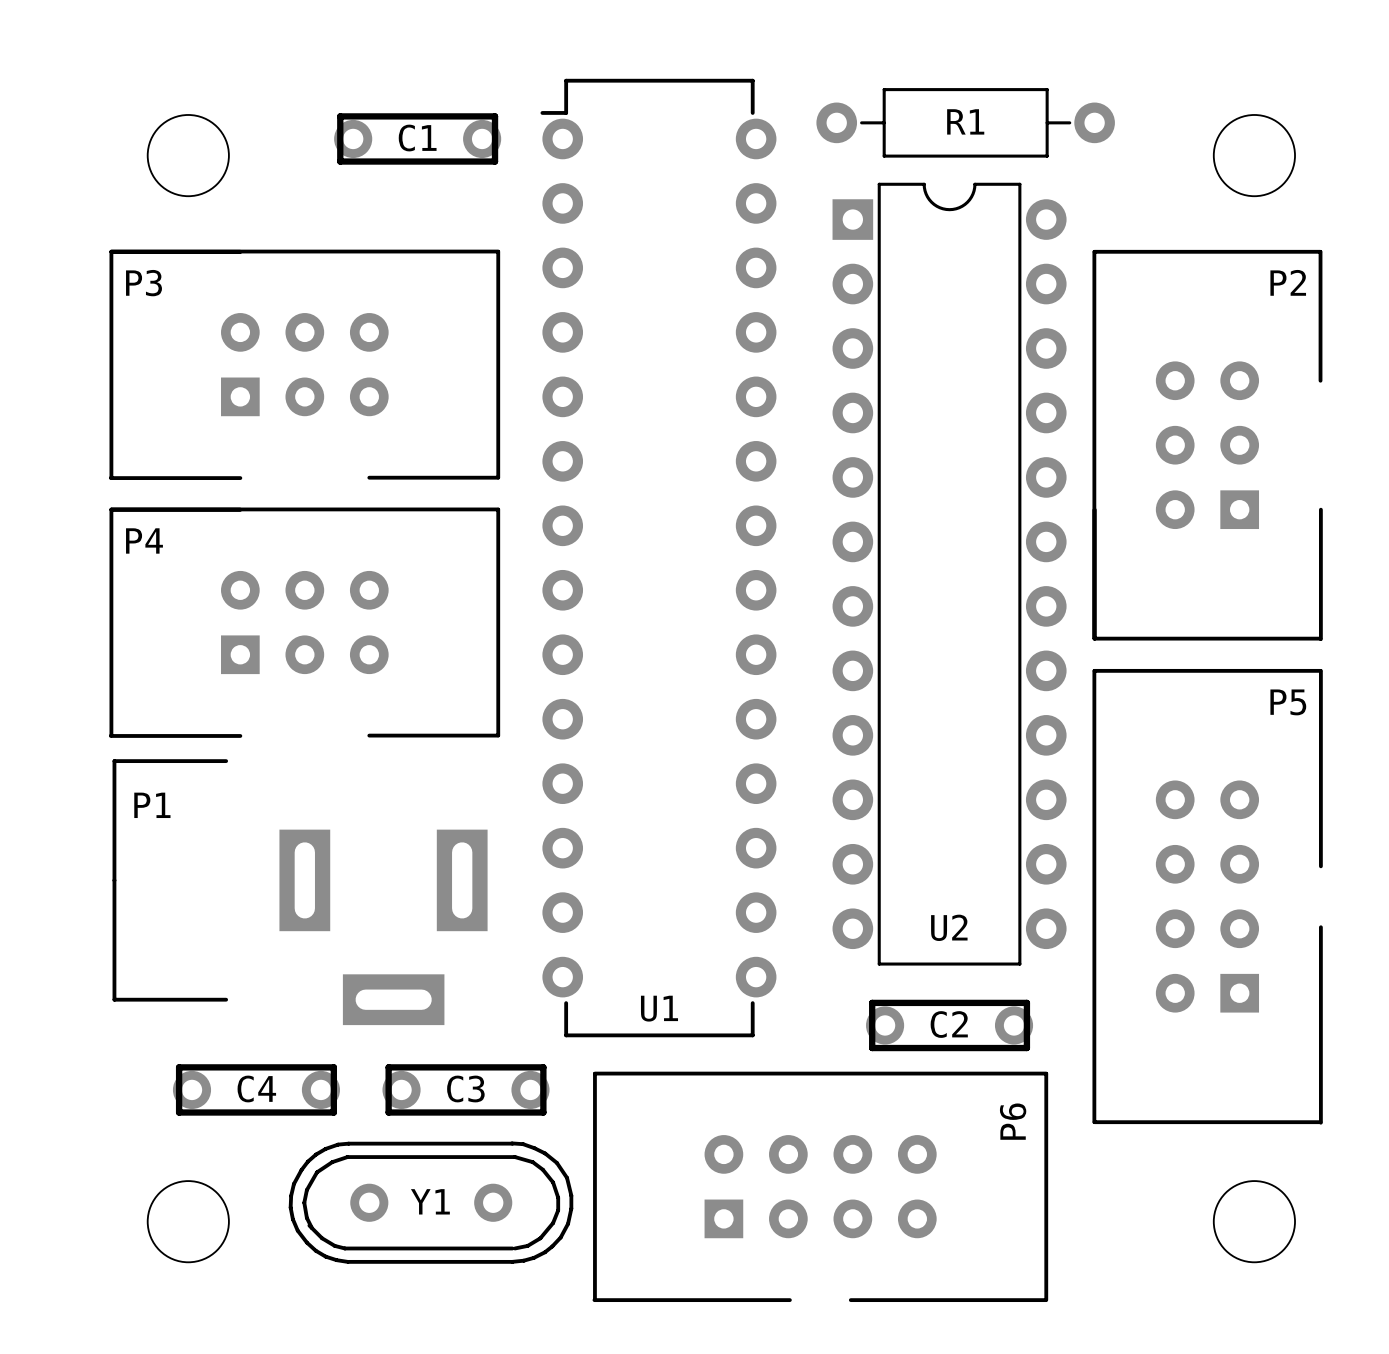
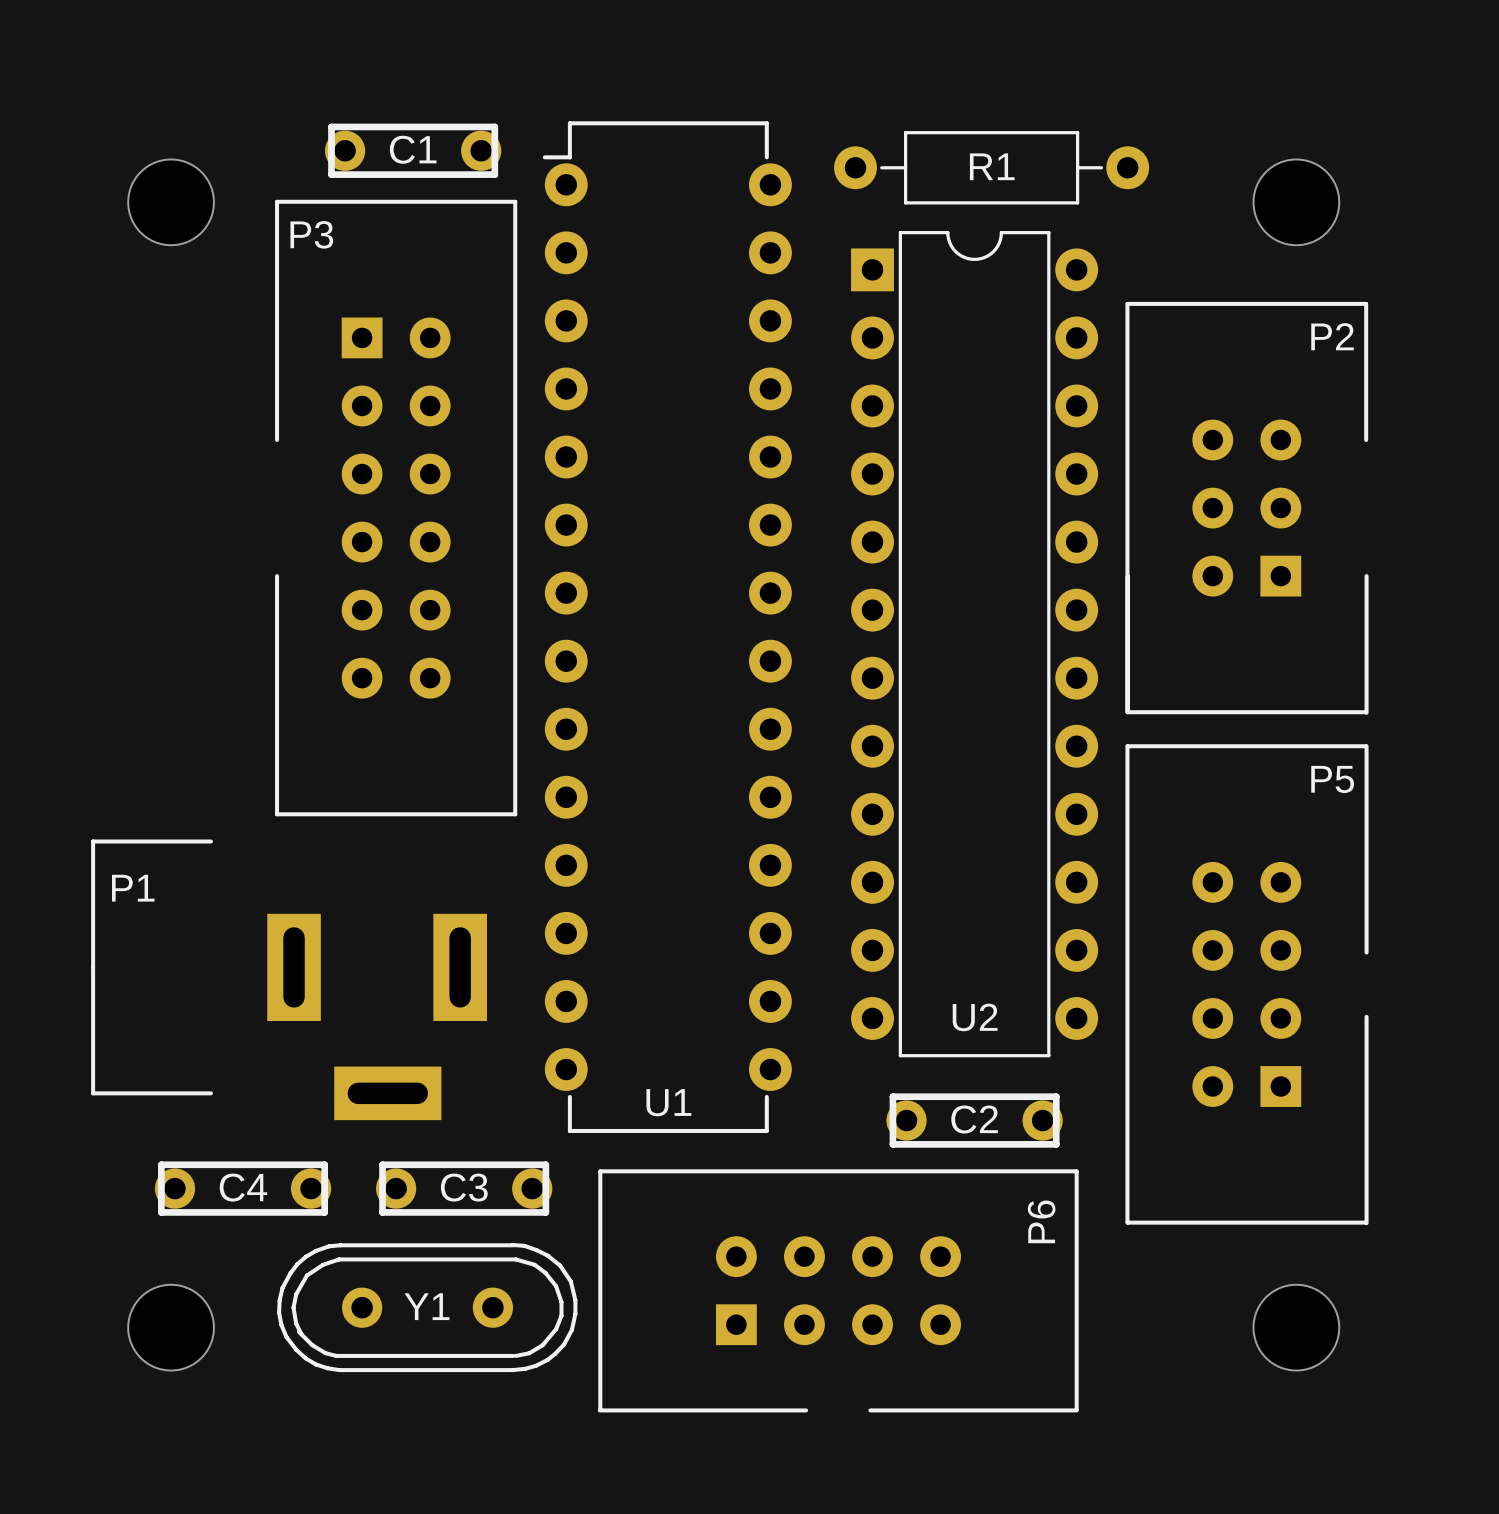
C1 position: (417, 138) -> (413, 150)
P3 footprint: [108, 249, 501, 480] -> [275, 199, 518, 817]
P3 name position: P3 (144, 283) -> P3 (311, 234)
P4: (304, 622) -> none

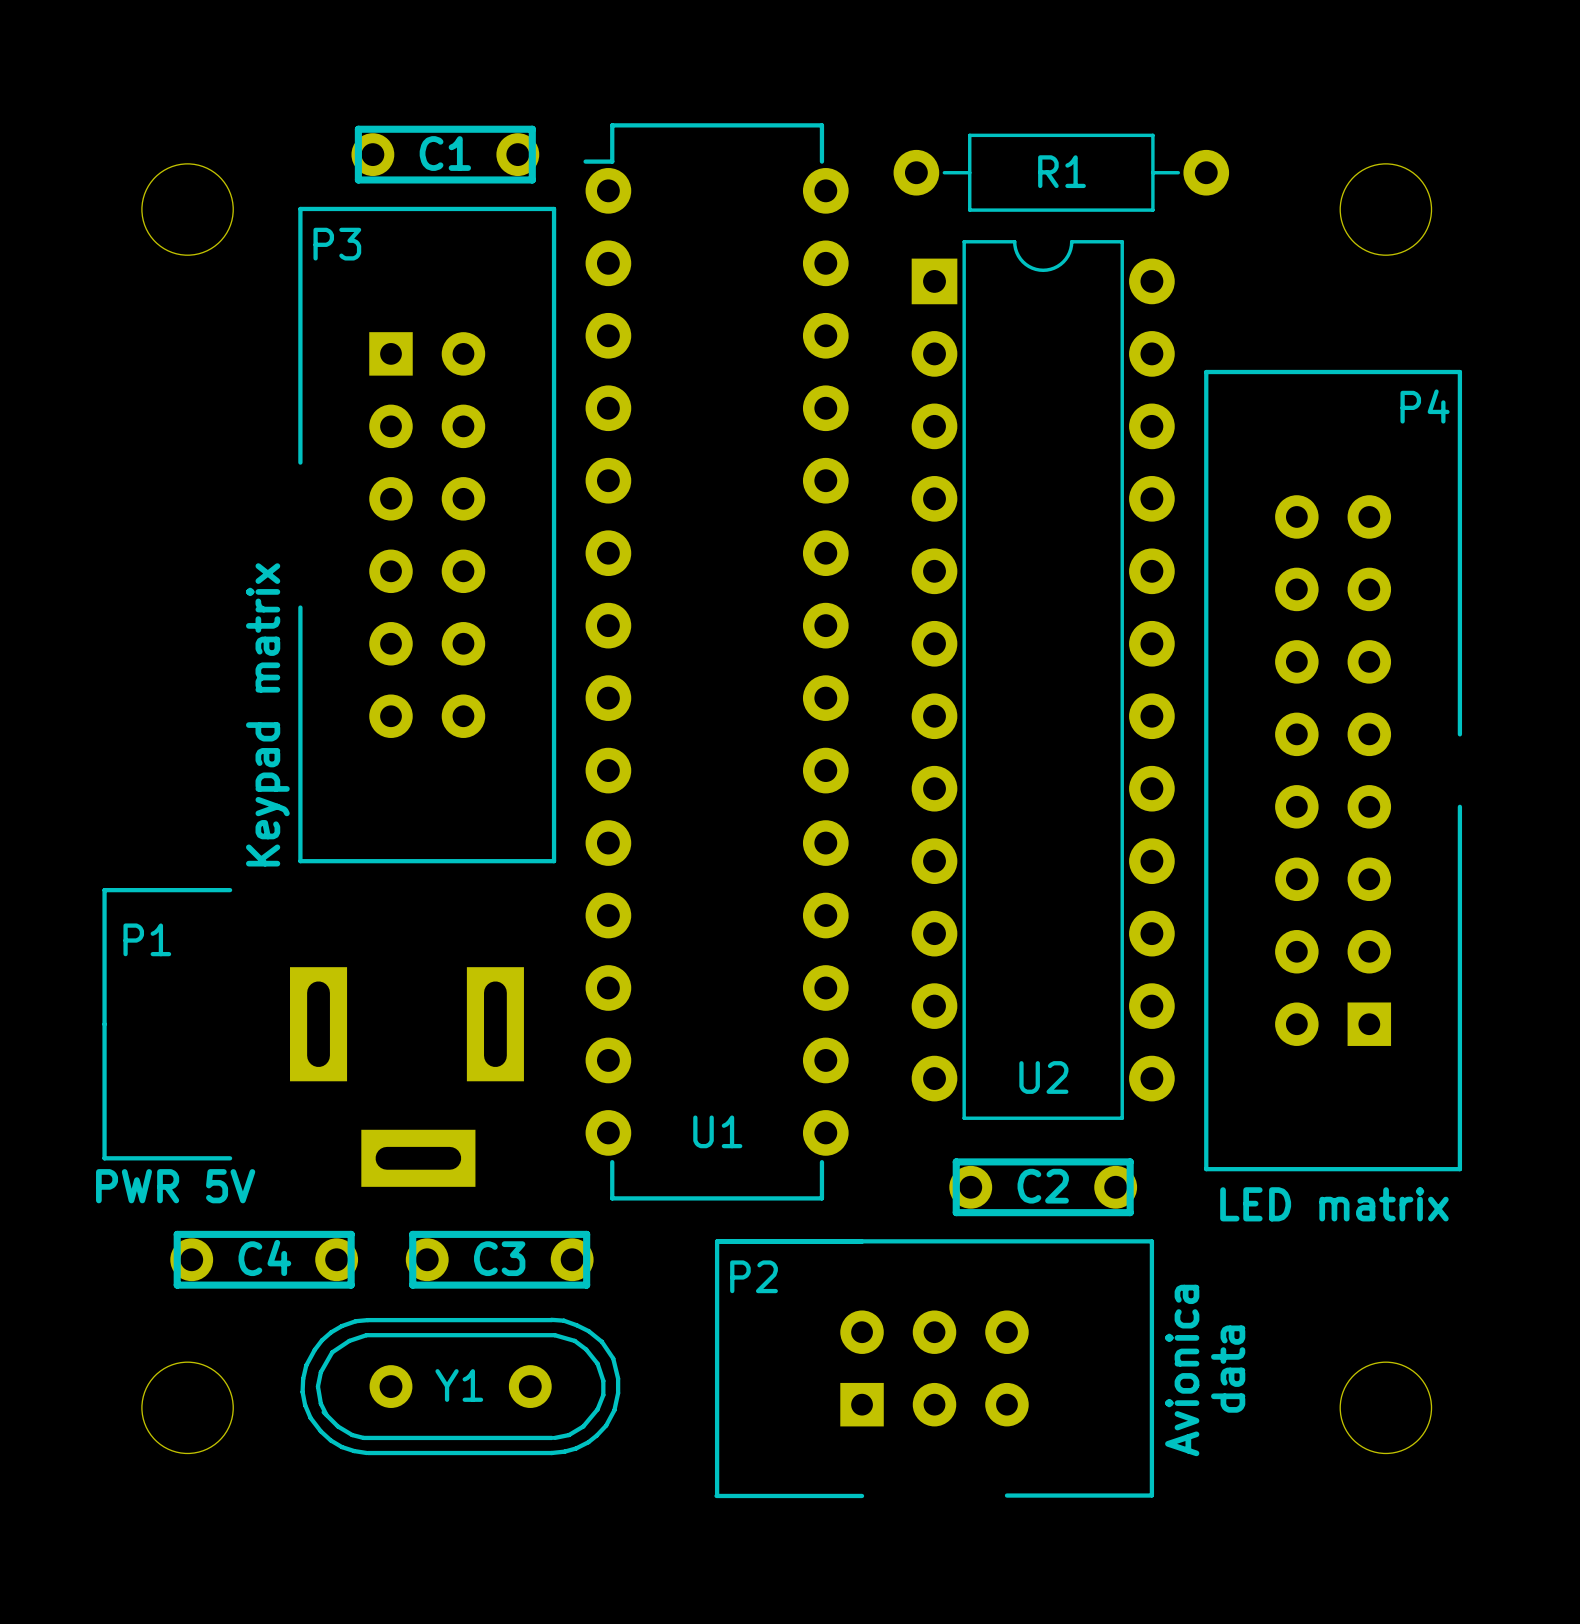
P2 name position: P2 (1332, 336) -> P2 (754, 1276)
P2 rotation: 0° (1247, 508) -> 90° clockwise (934, 1368)
P2 position: (1247, 508) -> (934, 1368)
text: none -> Keypad matrix (267, 714)
P4: none -> (1333, 770)
P5: (1247, 984) -> none
U1 name position: U1 (668, 1102) -> U1 (717, 1131)
text: none -> PWR 5V (175, 1186)
text: none -> LED matrix (1334, 1204)
text: none -> data (1228, 1369)
P6: (838, 1290) -> none
text: none -> Avionica (1182, 1370)

